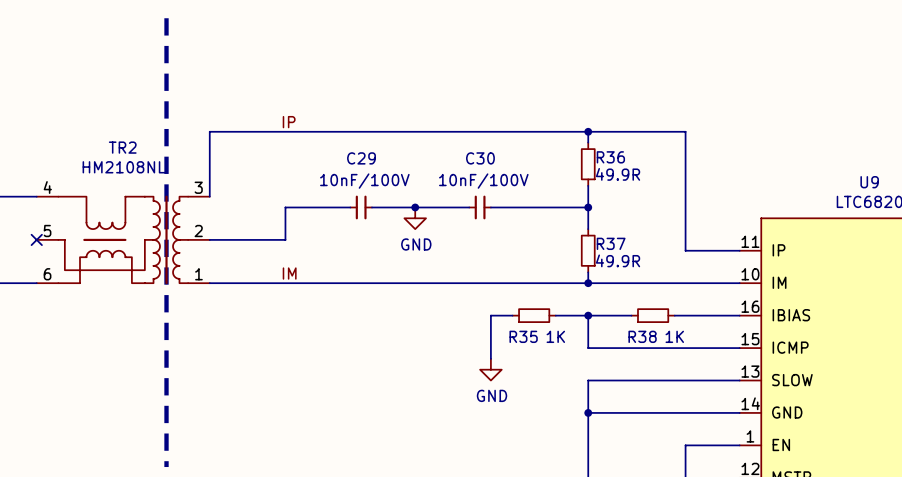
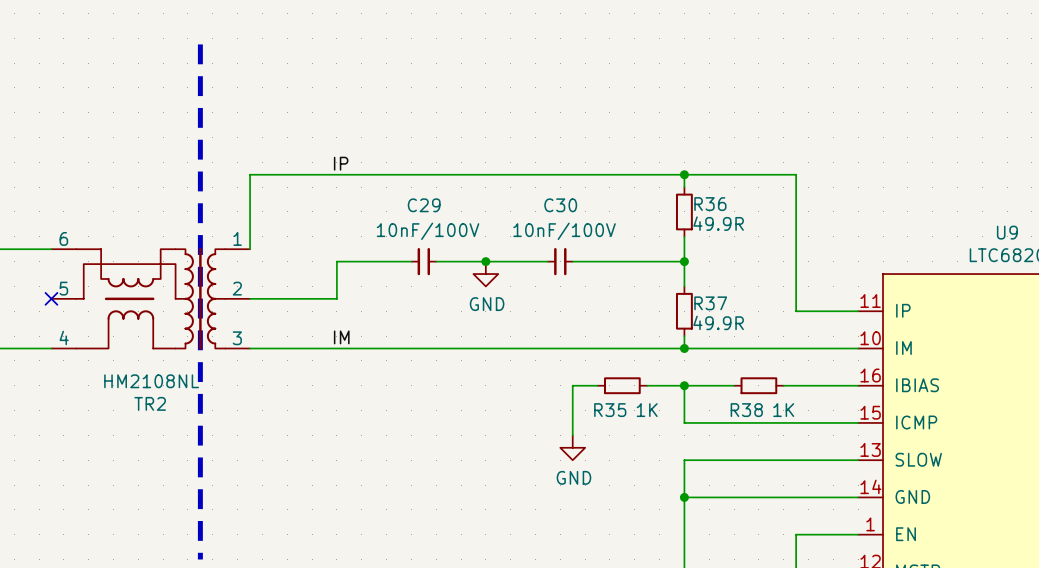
TR2 flip: as is (122, 239) -> up-down (150, 298)

